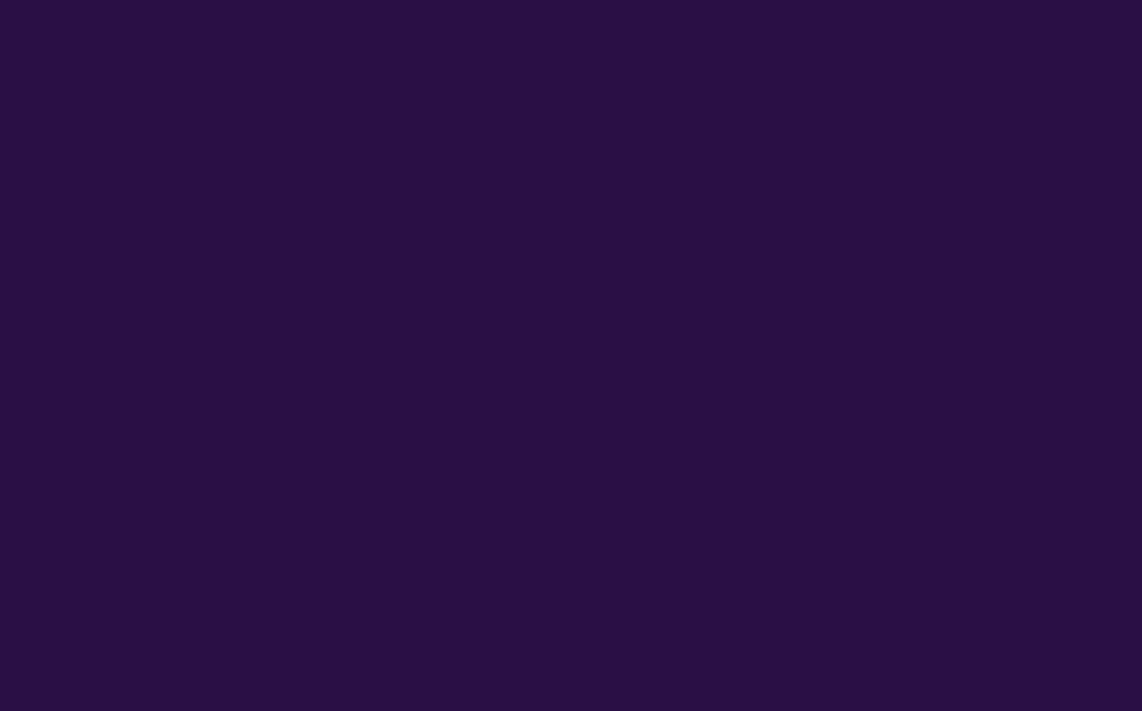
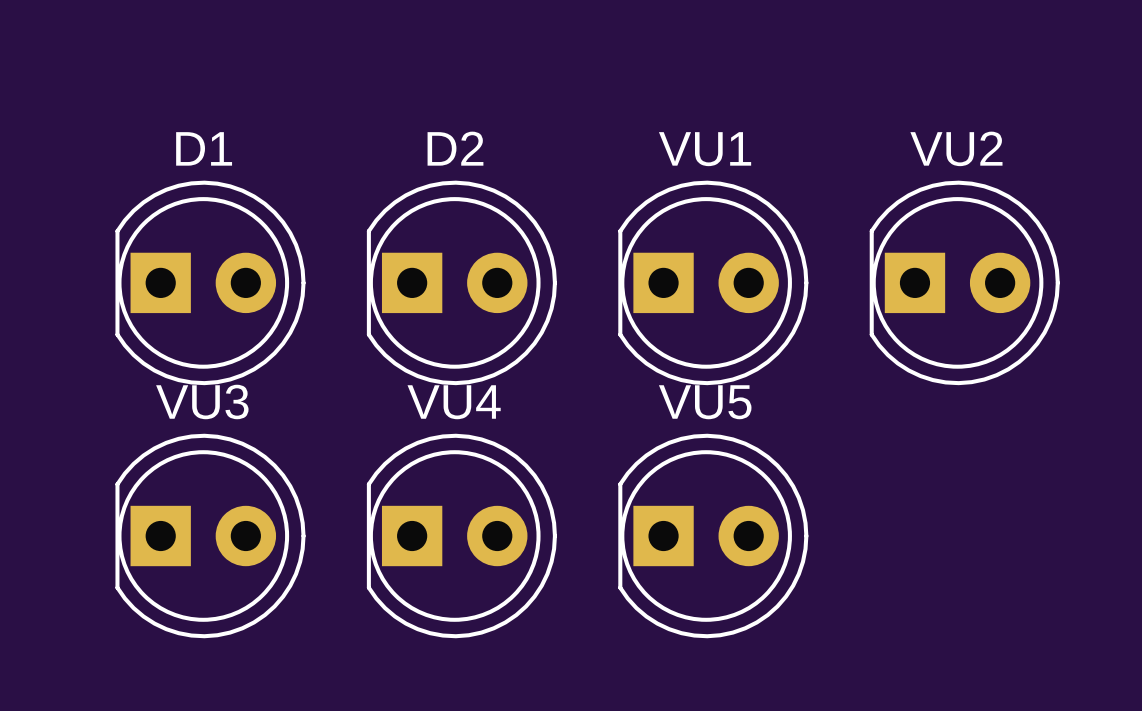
D1: none -> (210, 282)
D2: none -> (461, 282)
VU1: none -> (713, 282)
VU2: none -> (964, 282)
VU3: none -> (210, 536)
VU4: none -> (461, 536)
VU5: none -> (713, 536)

